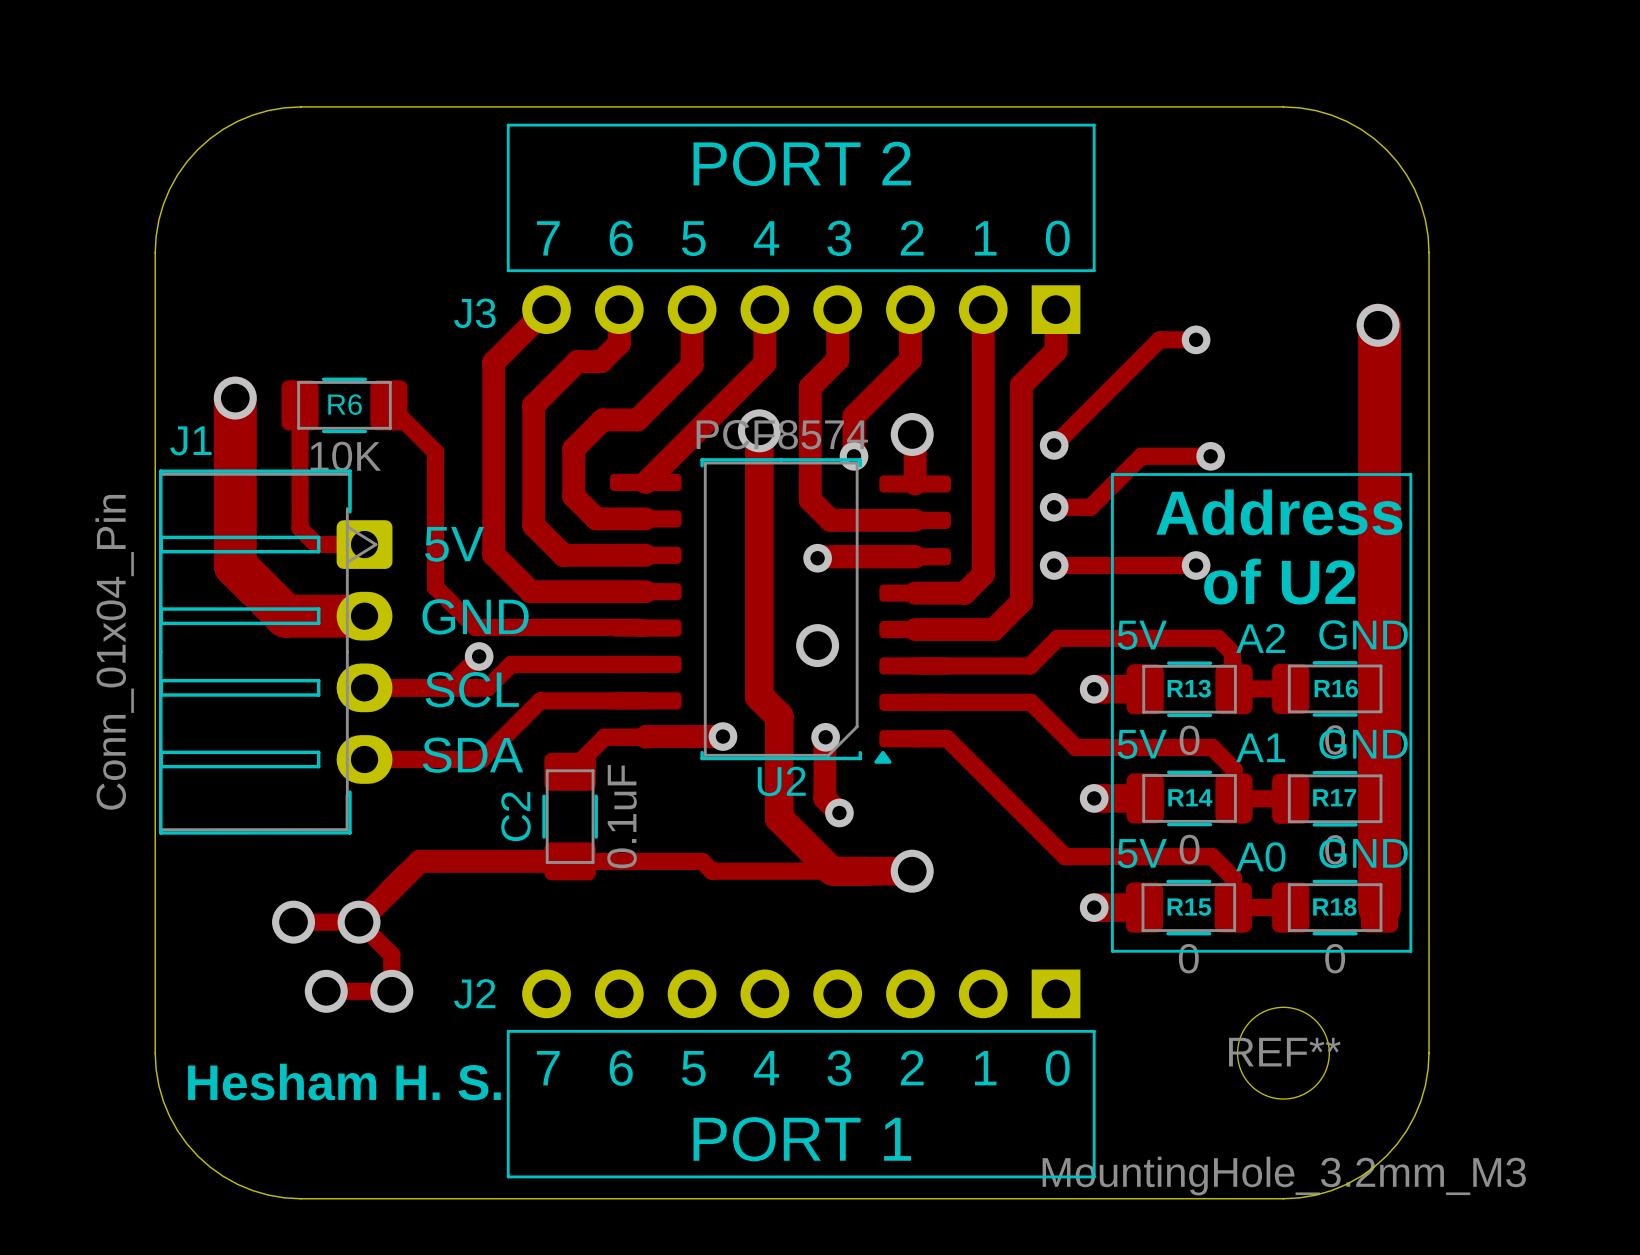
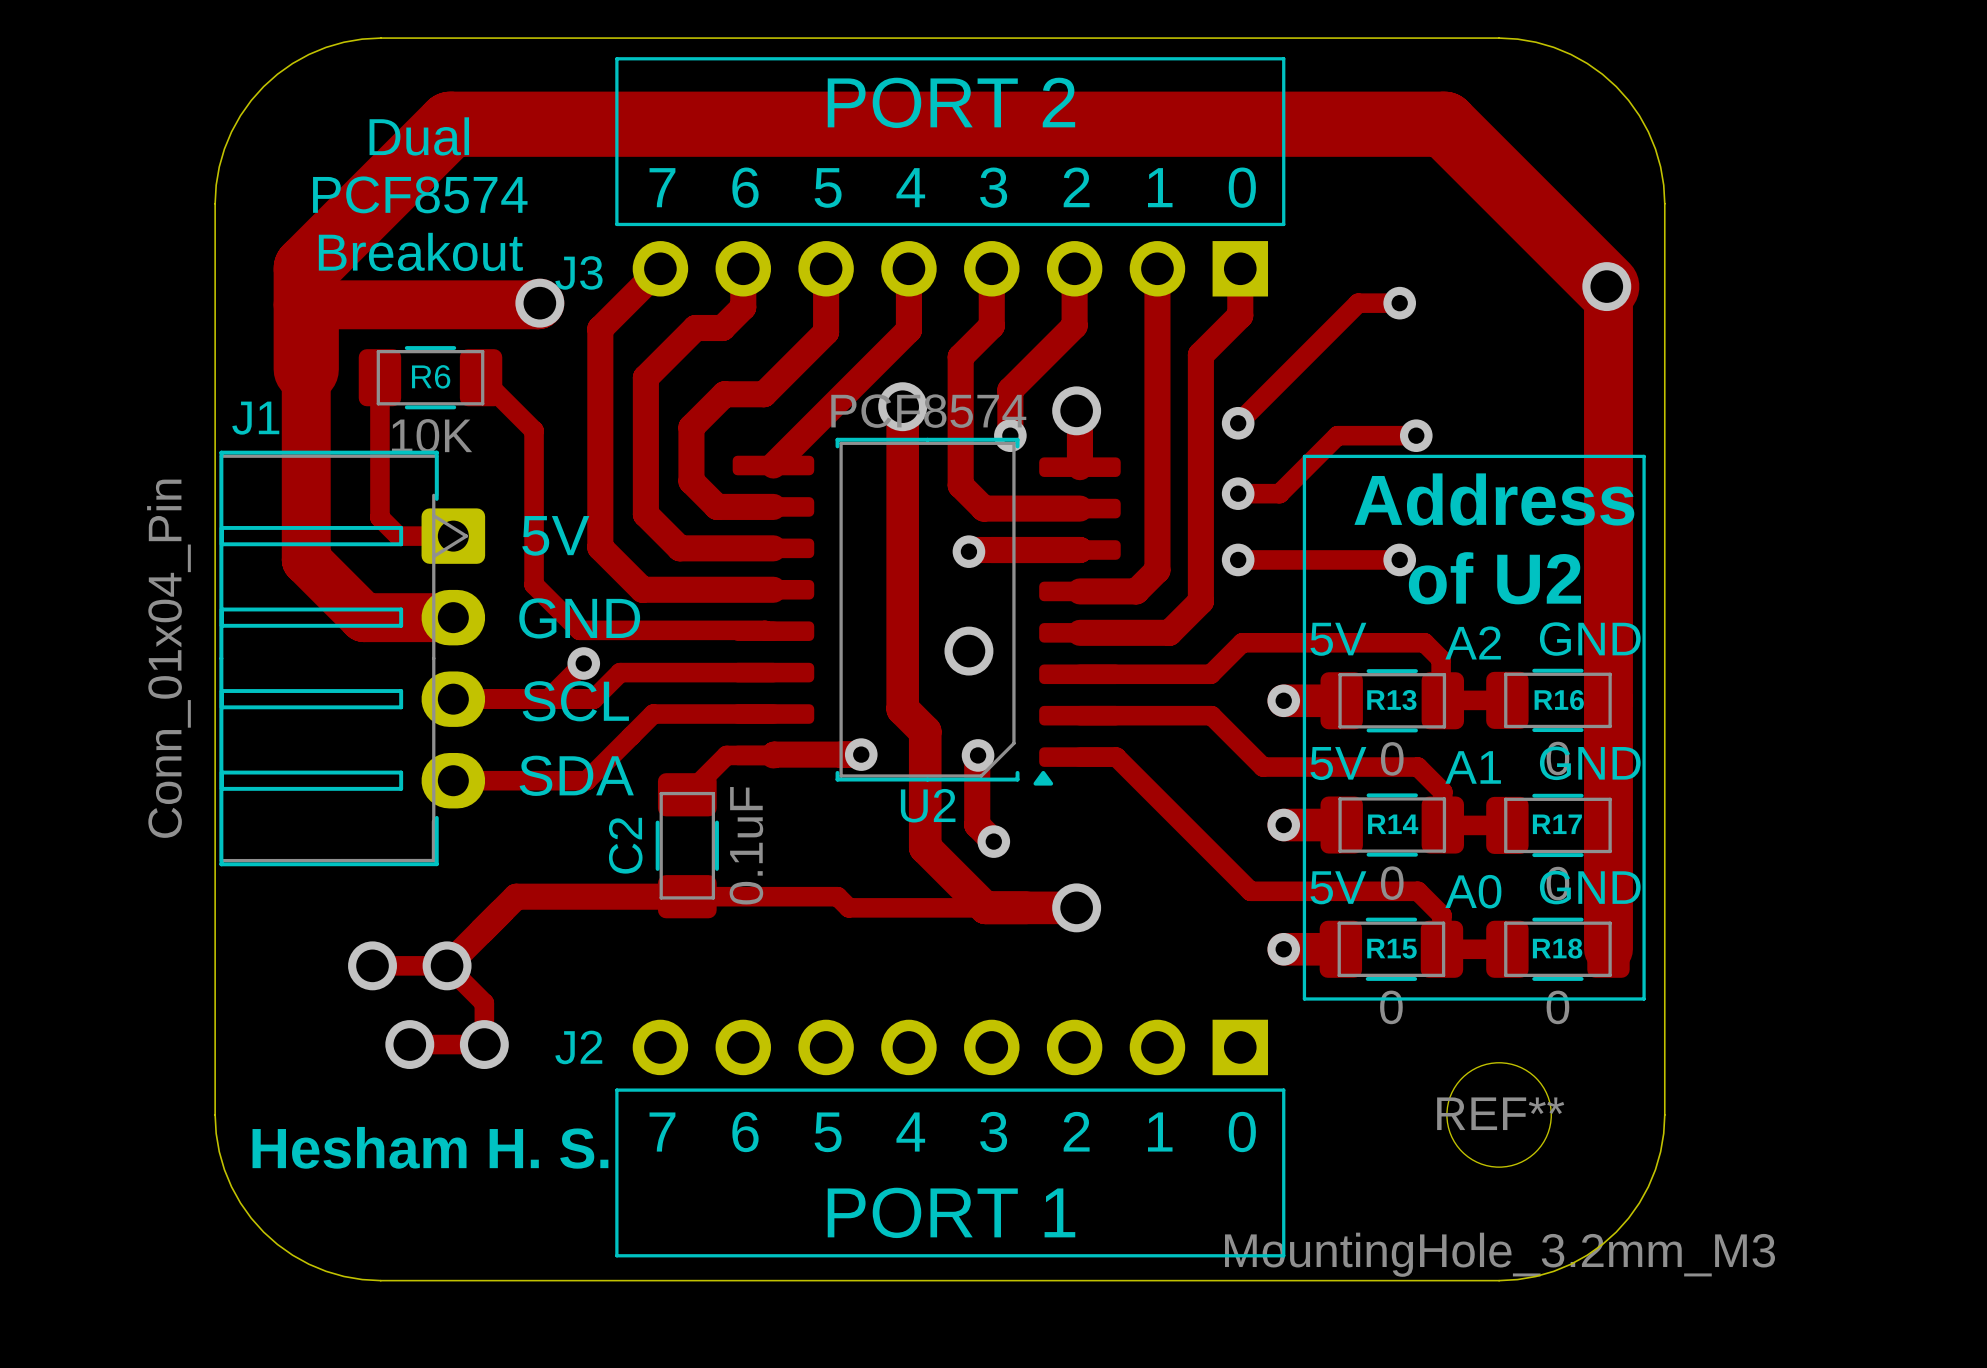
text: none -> Dual (419, 136)
text: none -> PCF8574 (420, 194)
text: none -> Breakout (420, 251)
track: none -> (1606, 286) (1444, 124) (450, 124) (306, 268) (306, 369)
track: none -> (539, 303) (538, 304) (306, 304)
via: none -> (539, 303)
via: (235, 398) -> none

